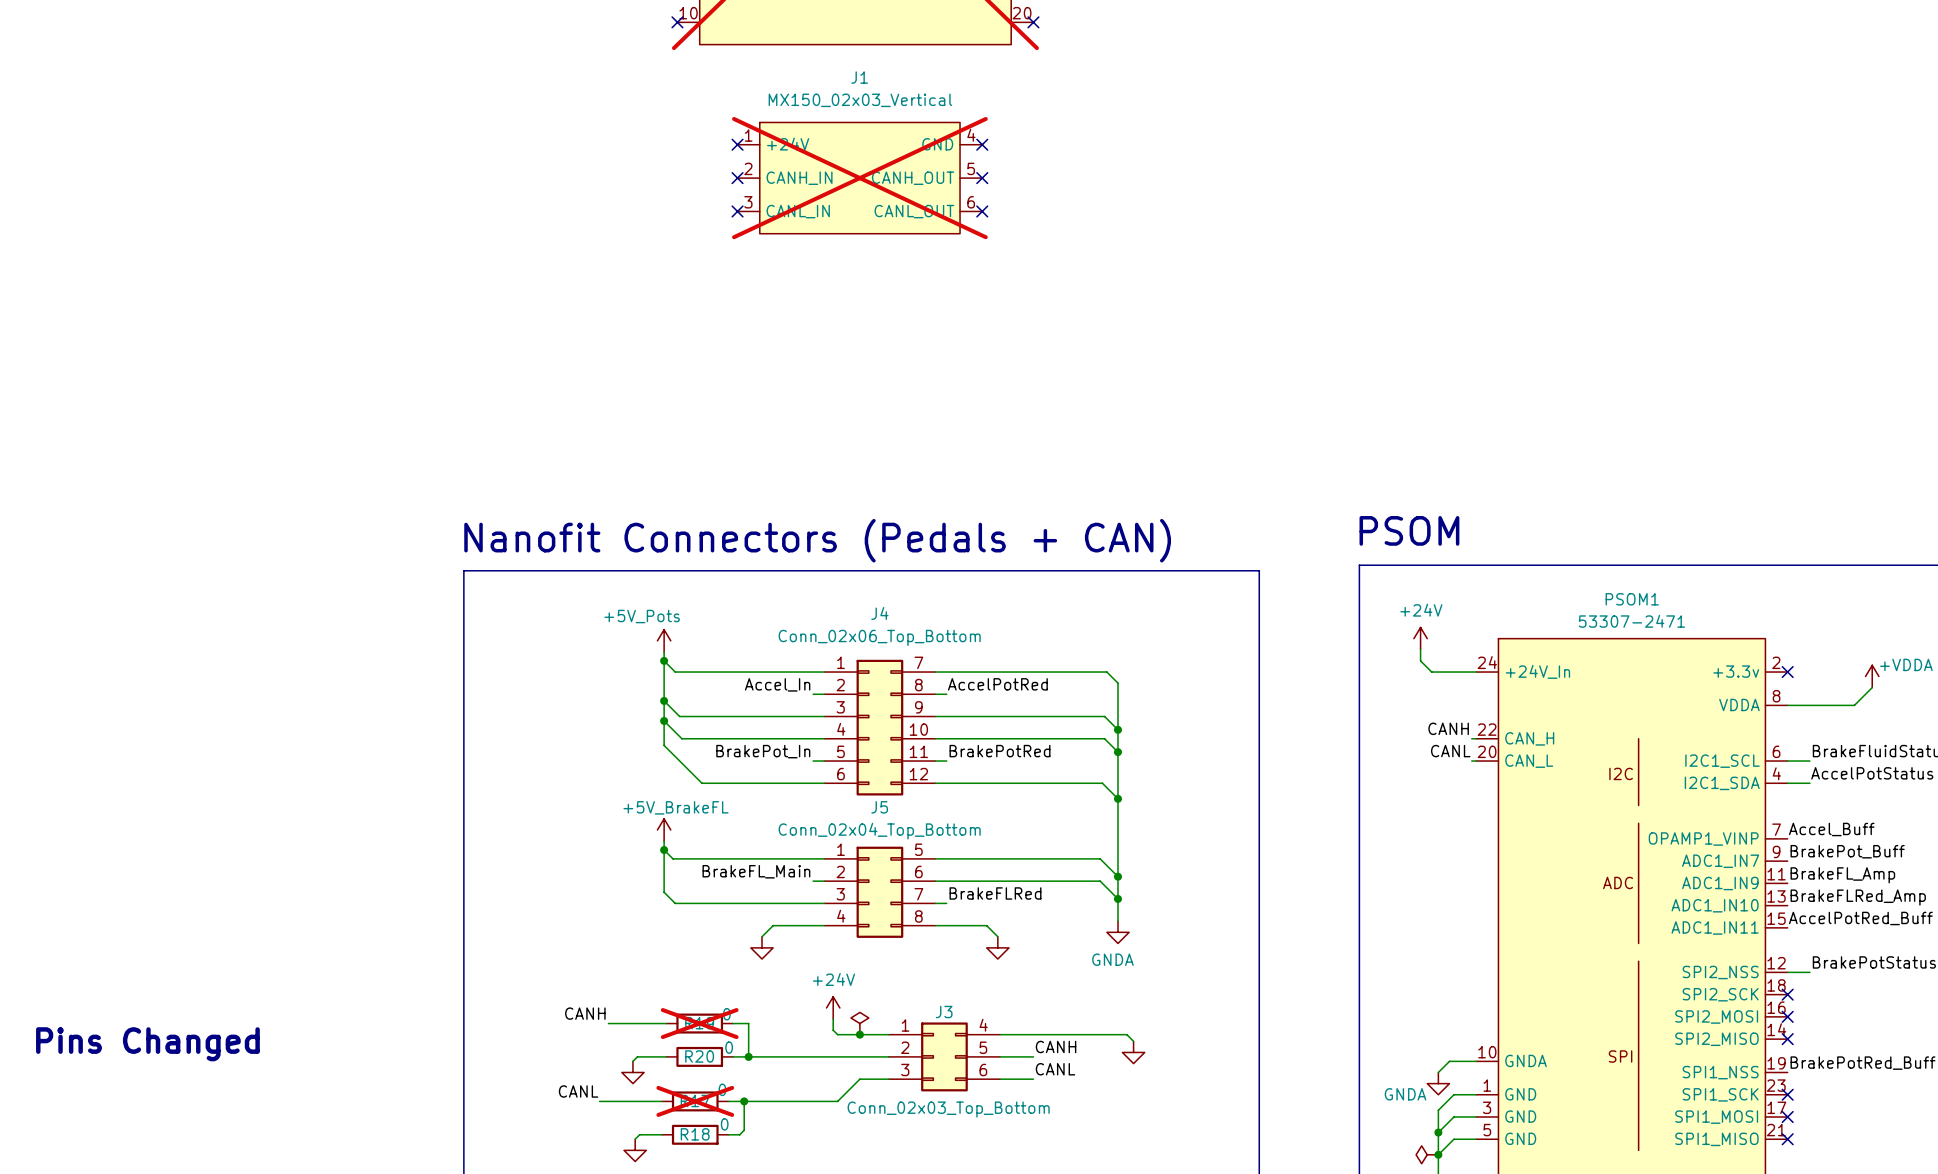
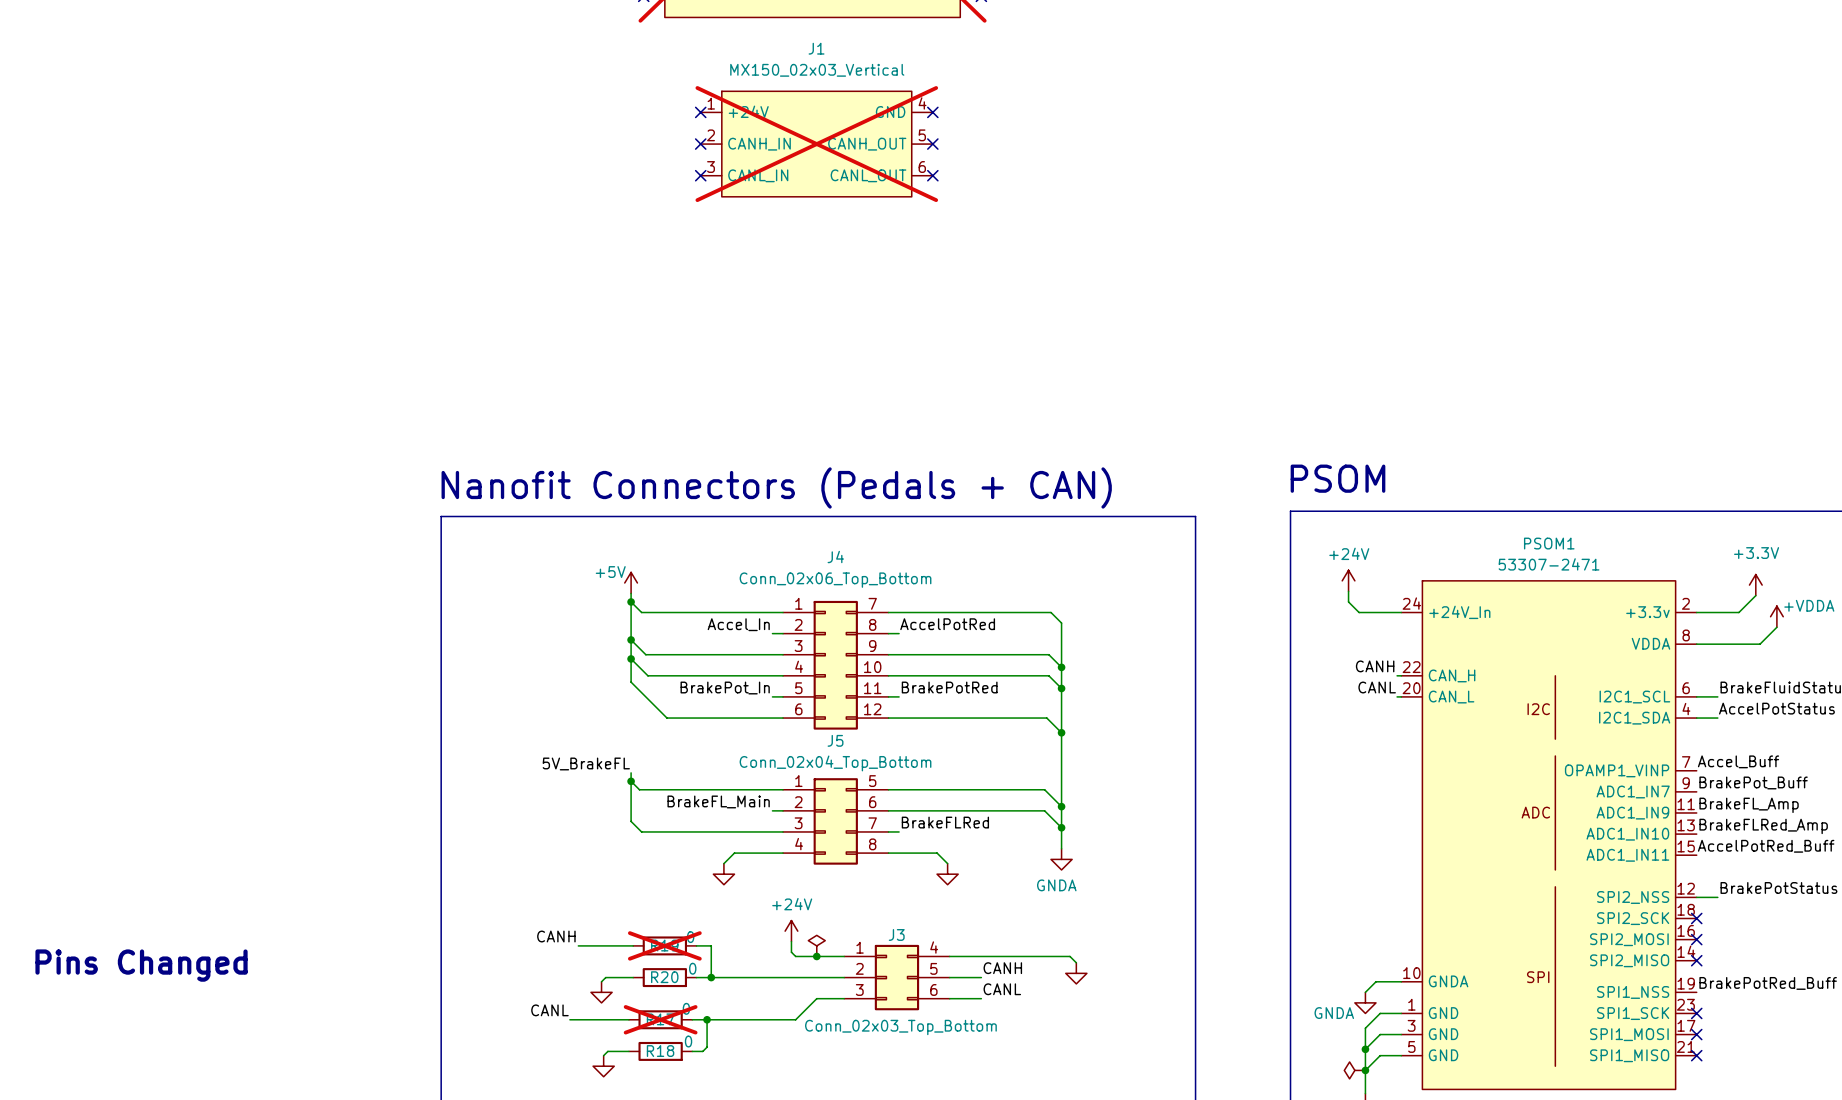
power symbol: +5V_Pots (664, 640) -> +5V (631, 582)
power symbol: none -> +3.3V (1755, 585)
wire: none -> (1755, 595) (1738, 612) (1696, 612)
no-connect mark: (1787, 672) -> none
power symbol: +5V_BrakeFL (664, 829) -> none
label: none -> 5V_BrakeFL (586, 763)

